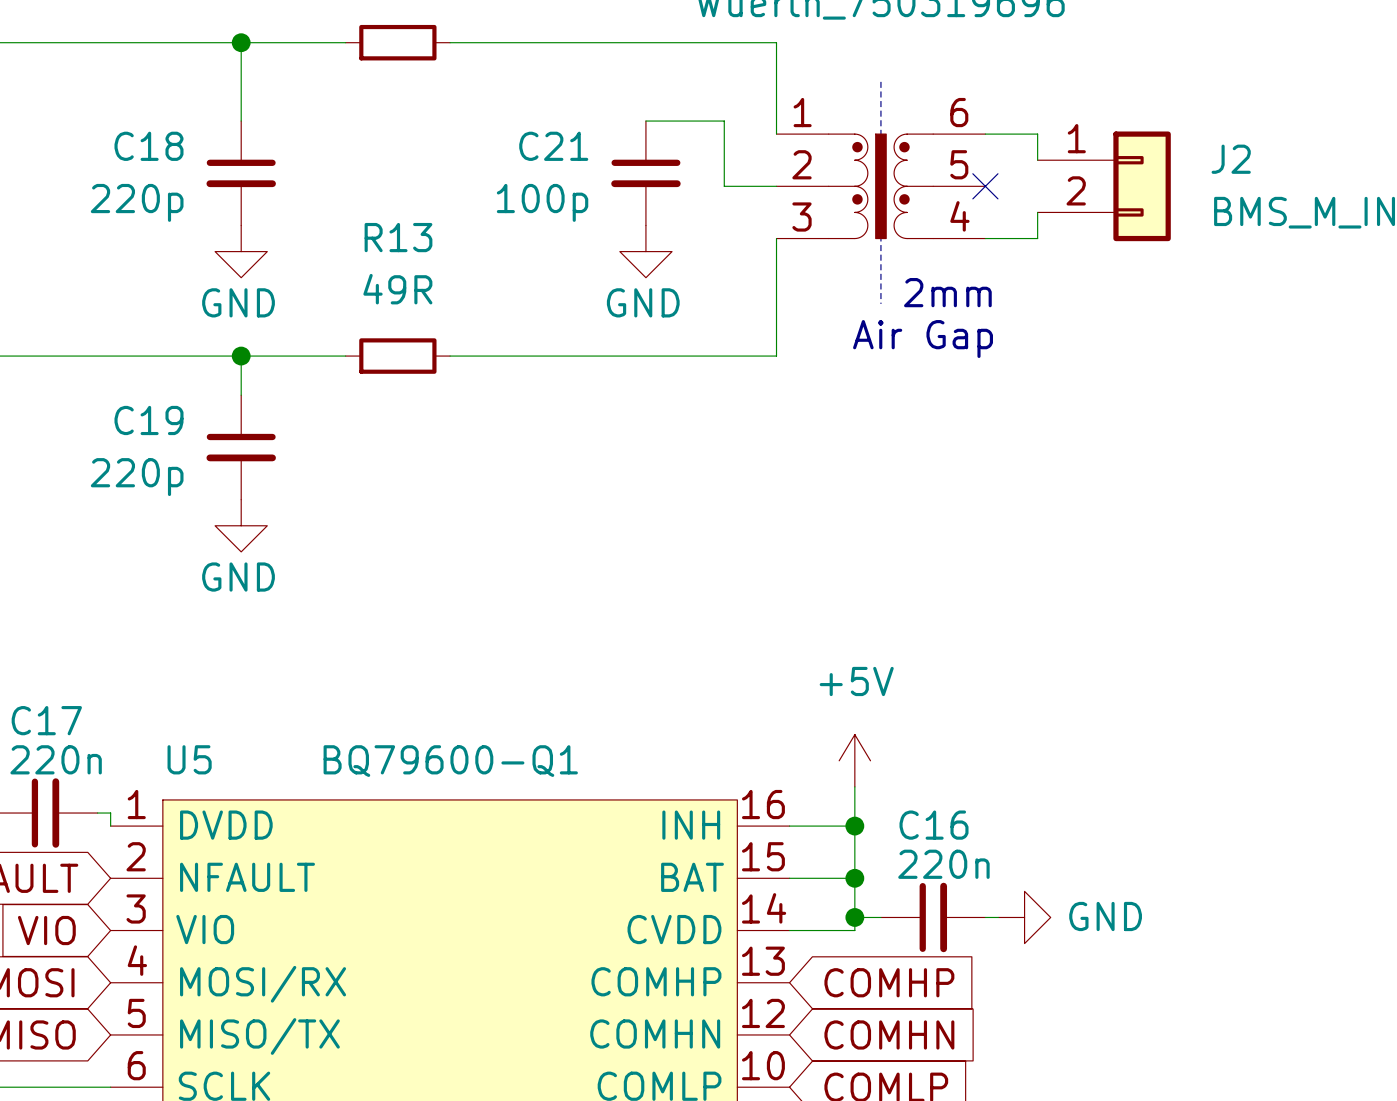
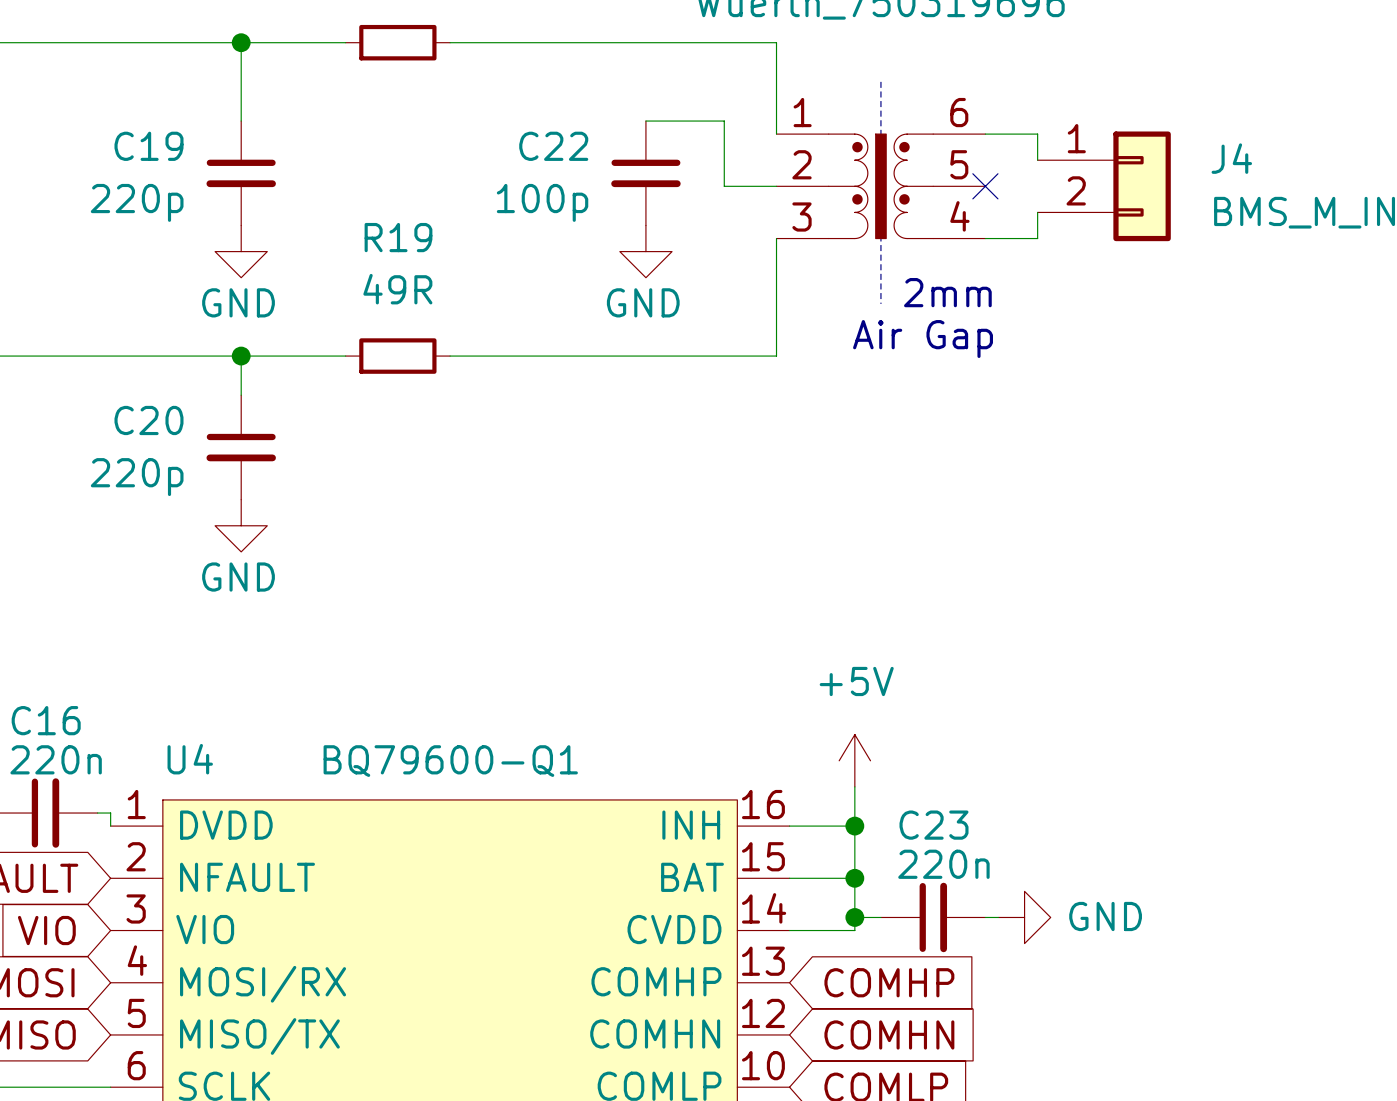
C18 name: C18 (148, 146) -> C19 (148, 146)
C21 name: C21 (553, 146) -> C22 (553, 146)
J2 name: J2 (1231, 159) -> J4 (1231, 158)
R13 name: R13 (398, 237) -> R19 (398, 237)
C19 name: C19 (148, 420) -> C20 (148, 420)
C17 name: C17 (46, 720) -> C16 (46, 720)
U5 name: U5 (189, 759) -> U4 (190, 759)
C16 name: C16 (934, 825) -> C23 (934, 825)

